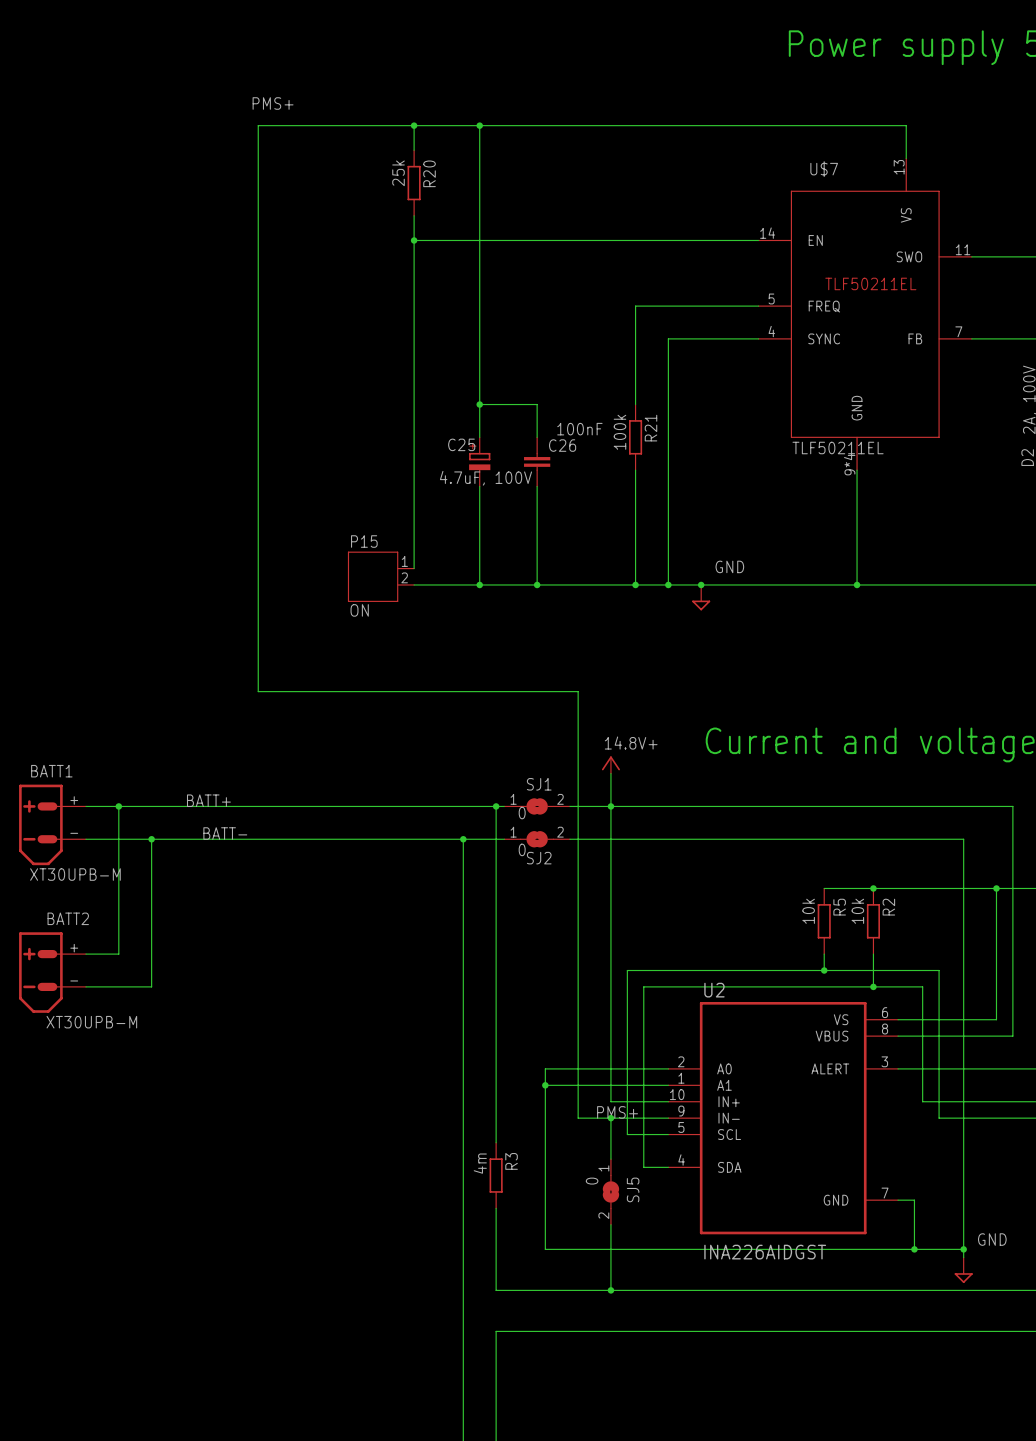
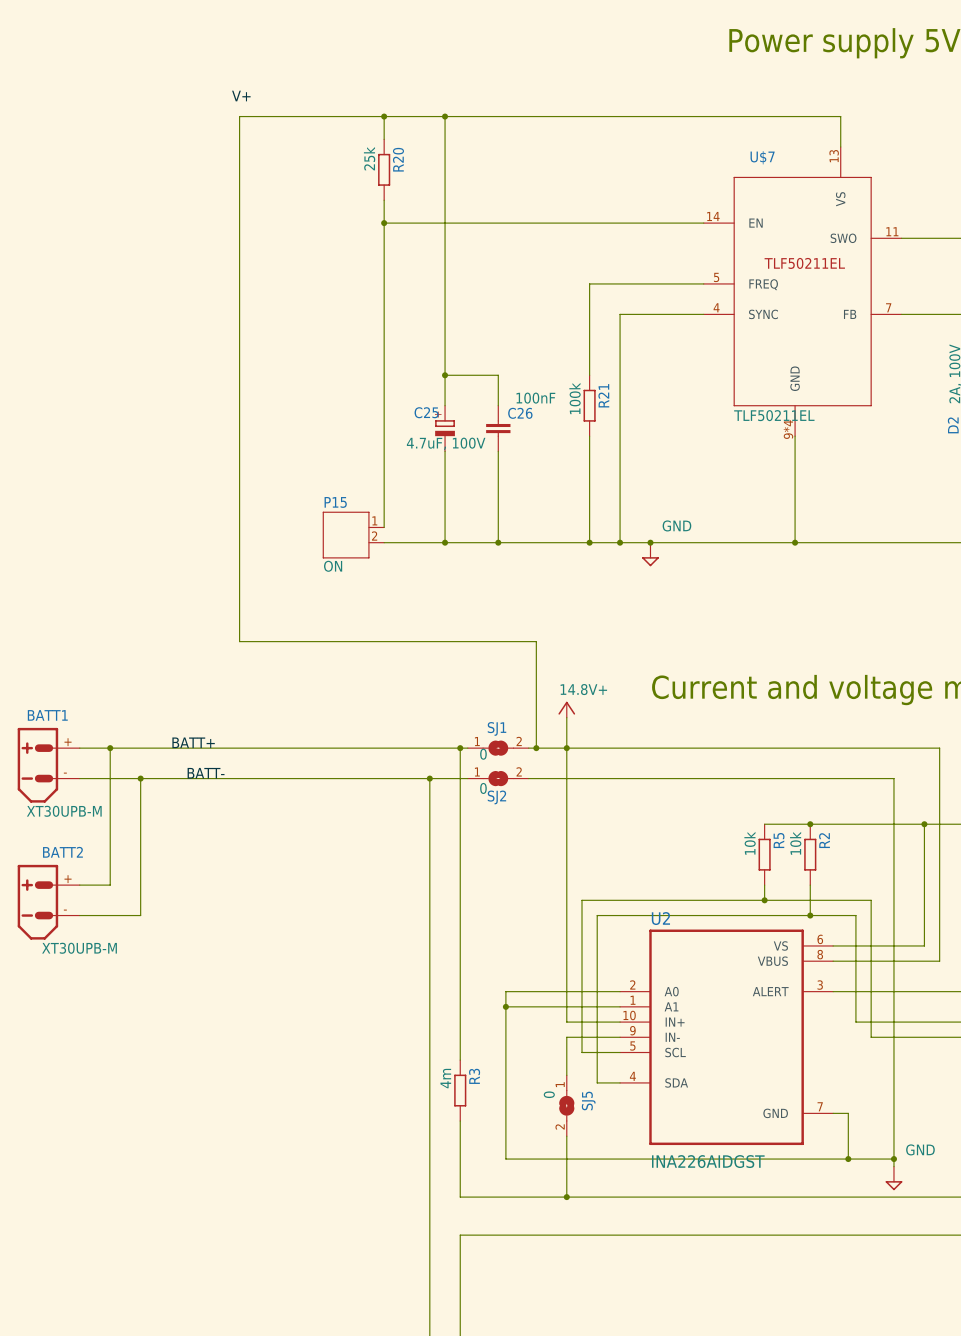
label: PMS+ (273, 103) -> V+ (241, 96)
wire: (578, 806) (578, 1118) (610, 1118) -> none
junction: none -> (536, 748)
label: PMS+ (617, 1112) -> none
junction: (610, 1118) -> none

